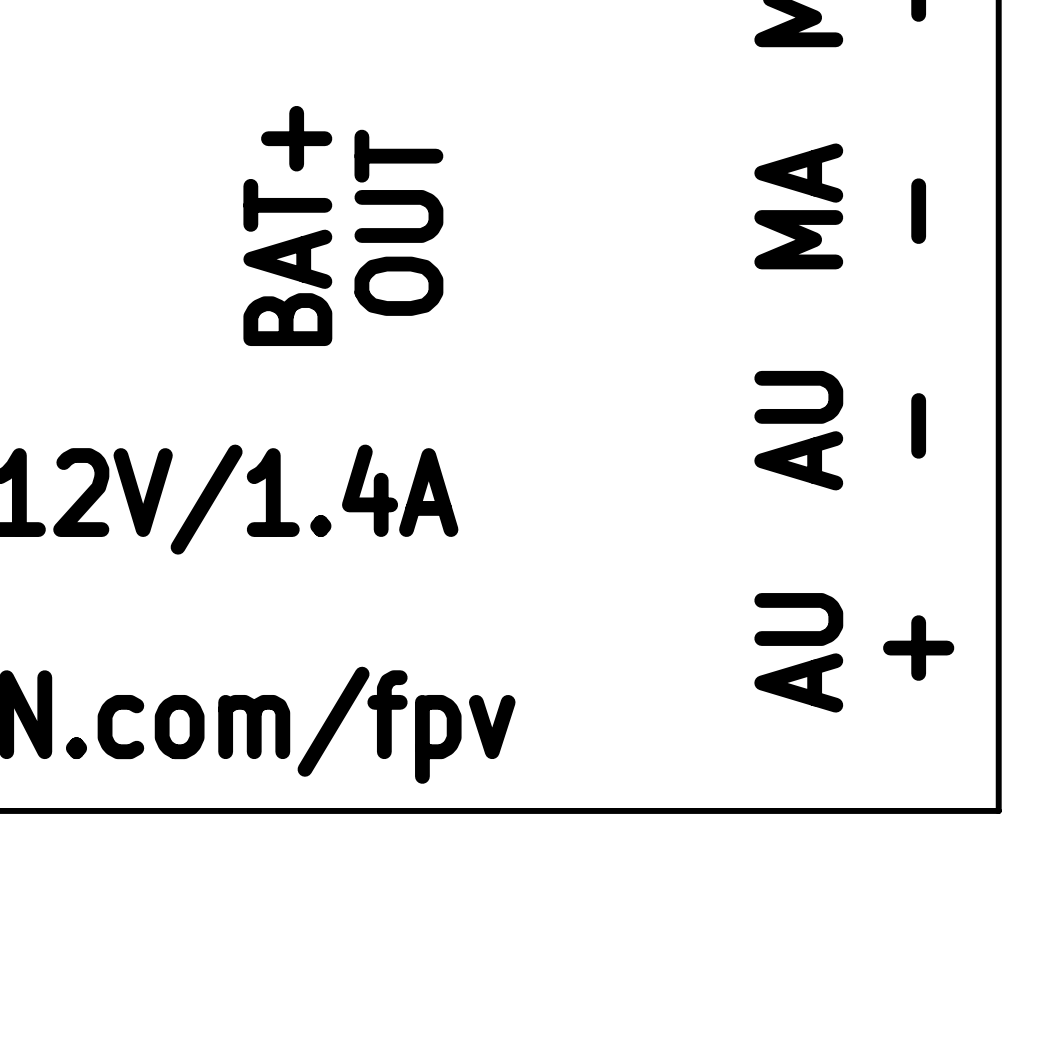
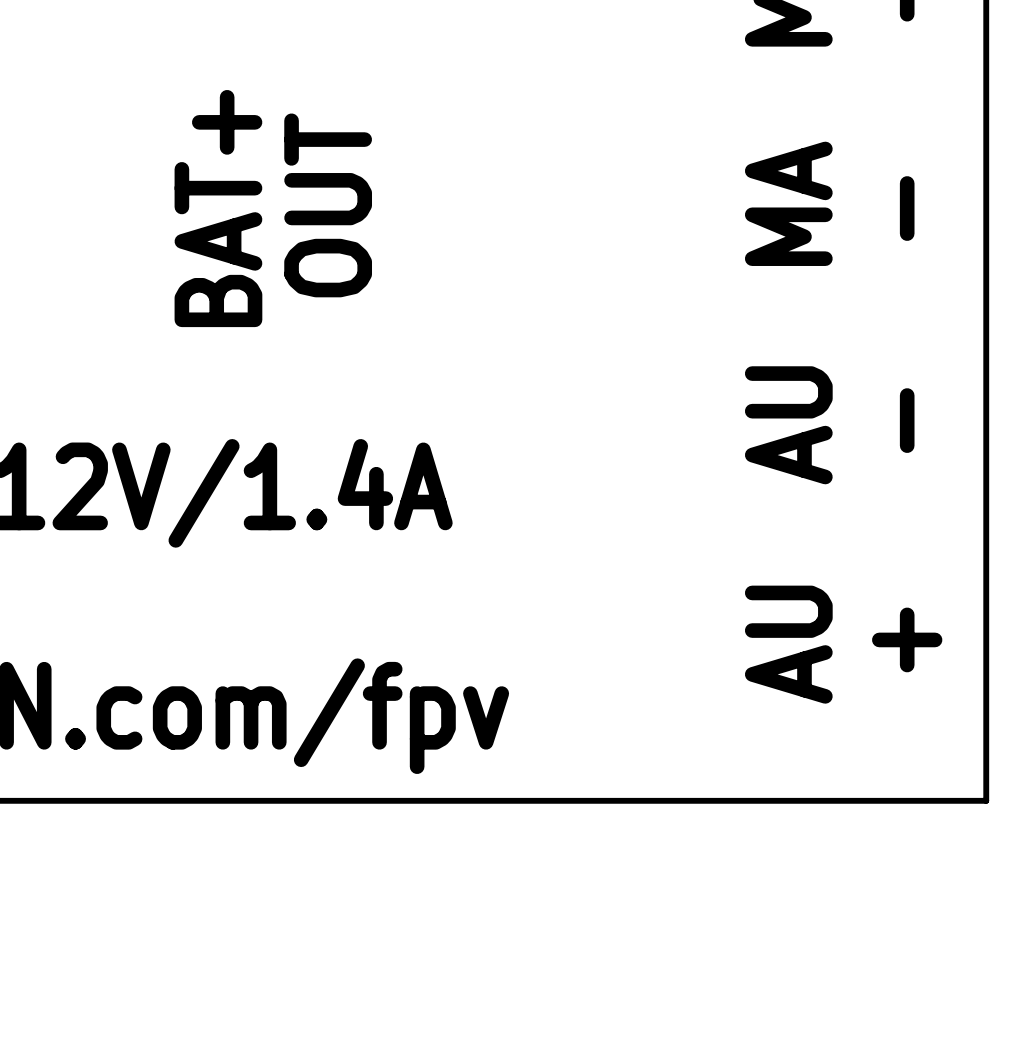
text position: OUT (398, 222) -> OUT (328, 205)
text position: BAT+ (287, 225) -> BAT+ (218, 208)

